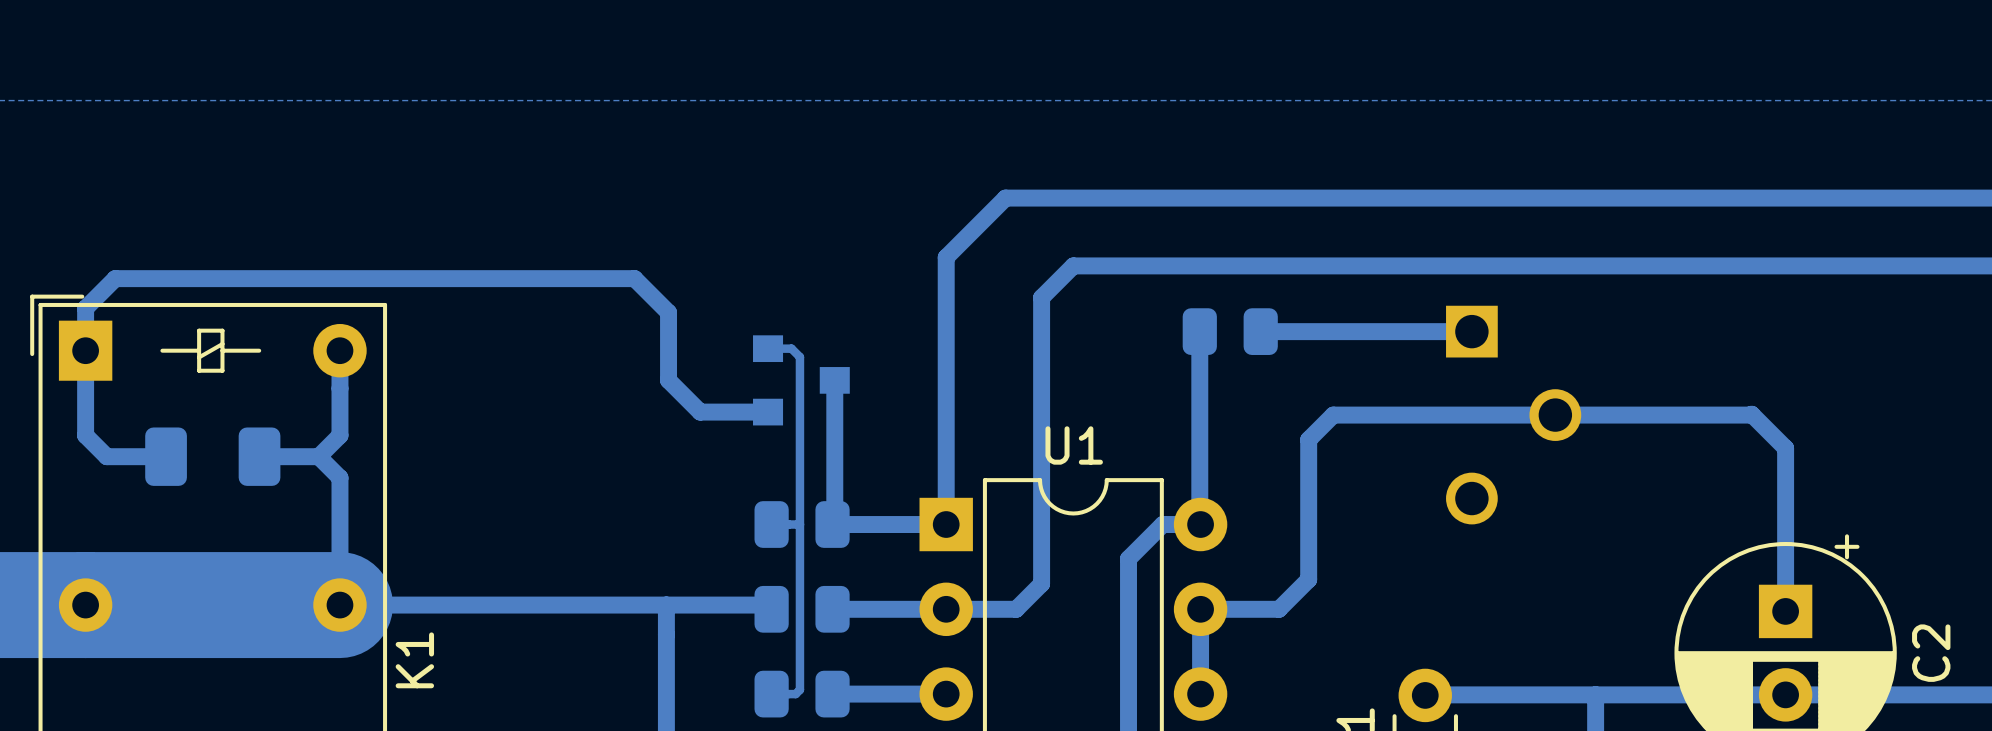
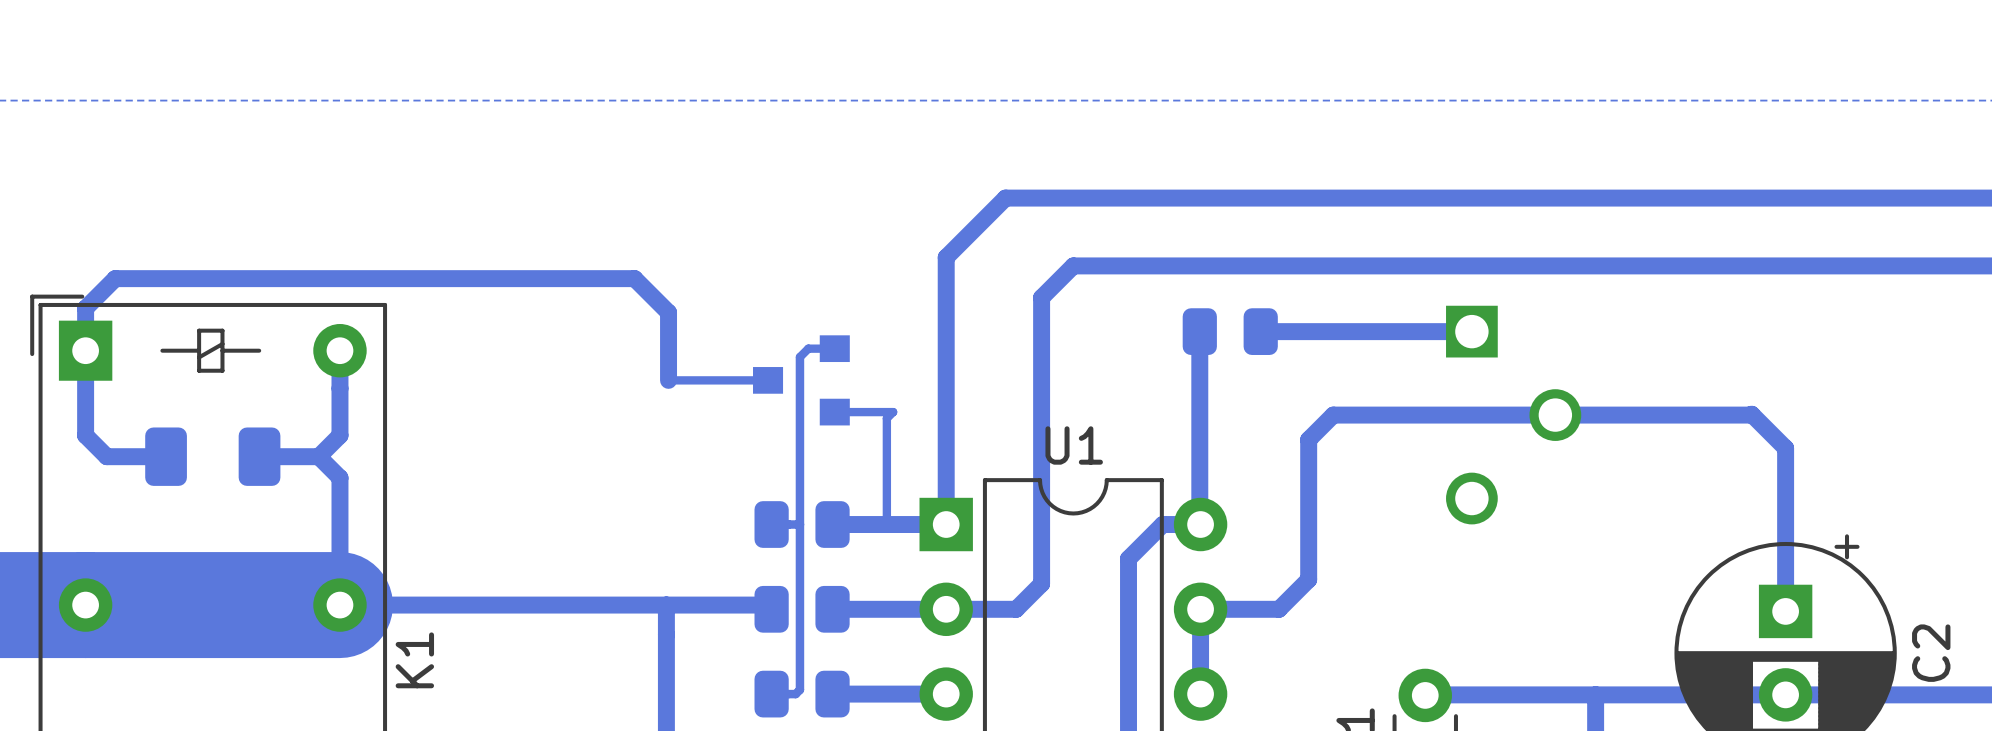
bottom track: (768, 348) (791, 348) (799, 357) -> (834, 348) (808, 348) (799, 357)
bottom track: (668, 380) (700, 412) (768, 412) -> (668, 380) (768, 380)
part rotation: 0° (801, 380) -> 180° (801, 380)
bottom track: (834, 380) (834, 522) -> none
bottom track: none -> (834, 412) (893, 412) (886, 418) (886, 524)

